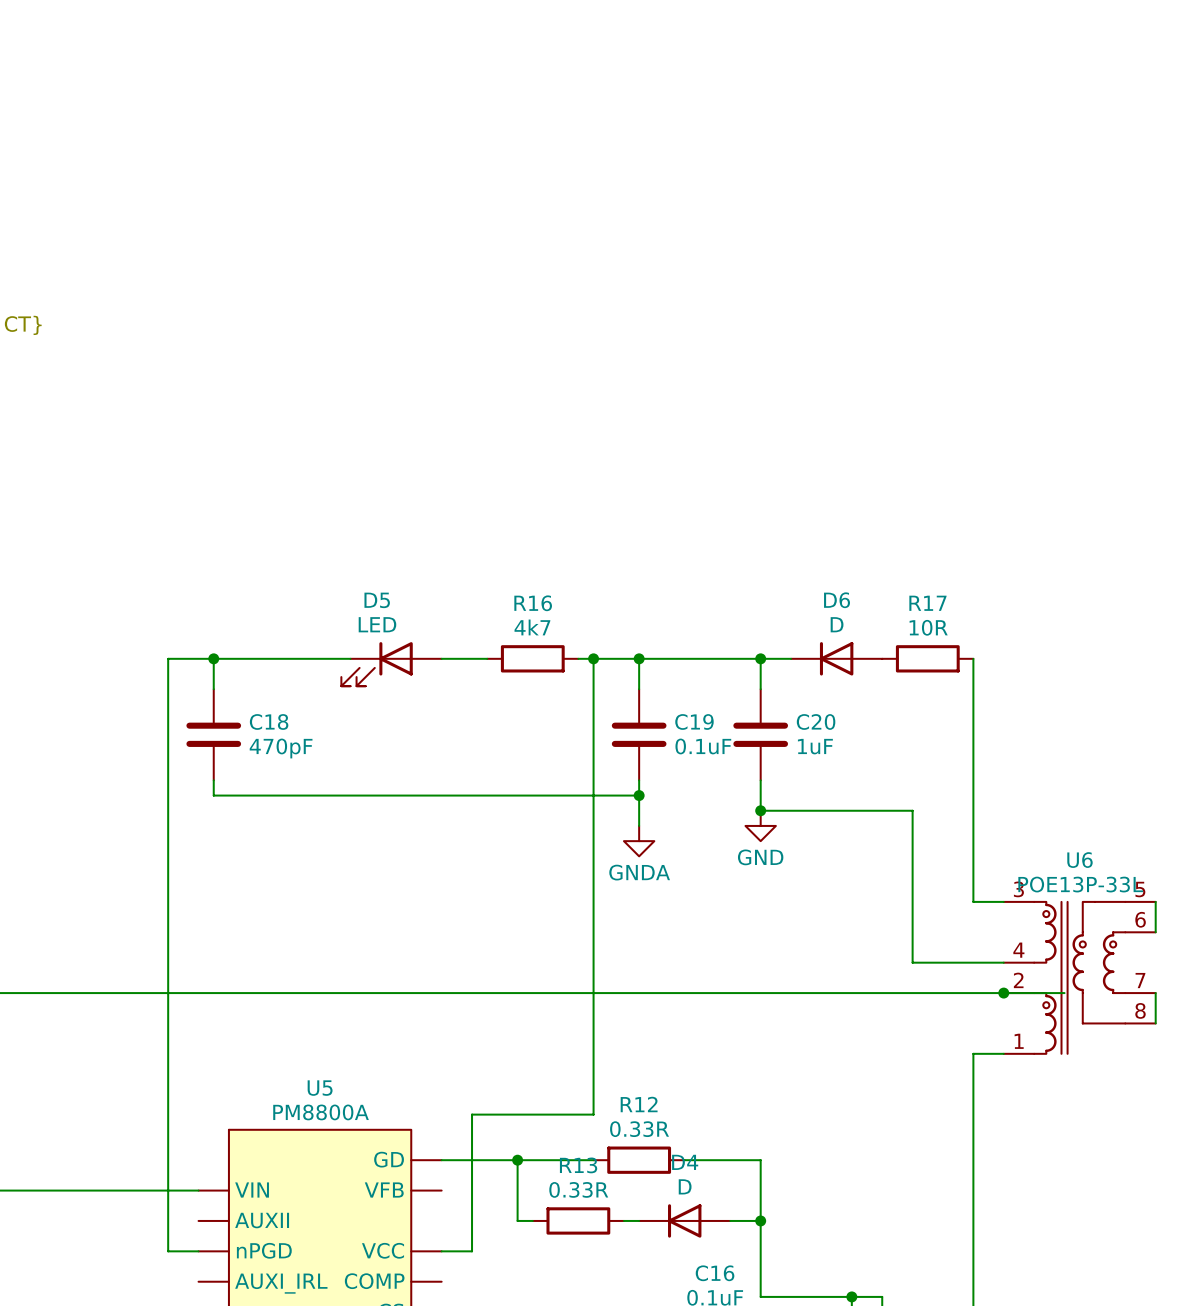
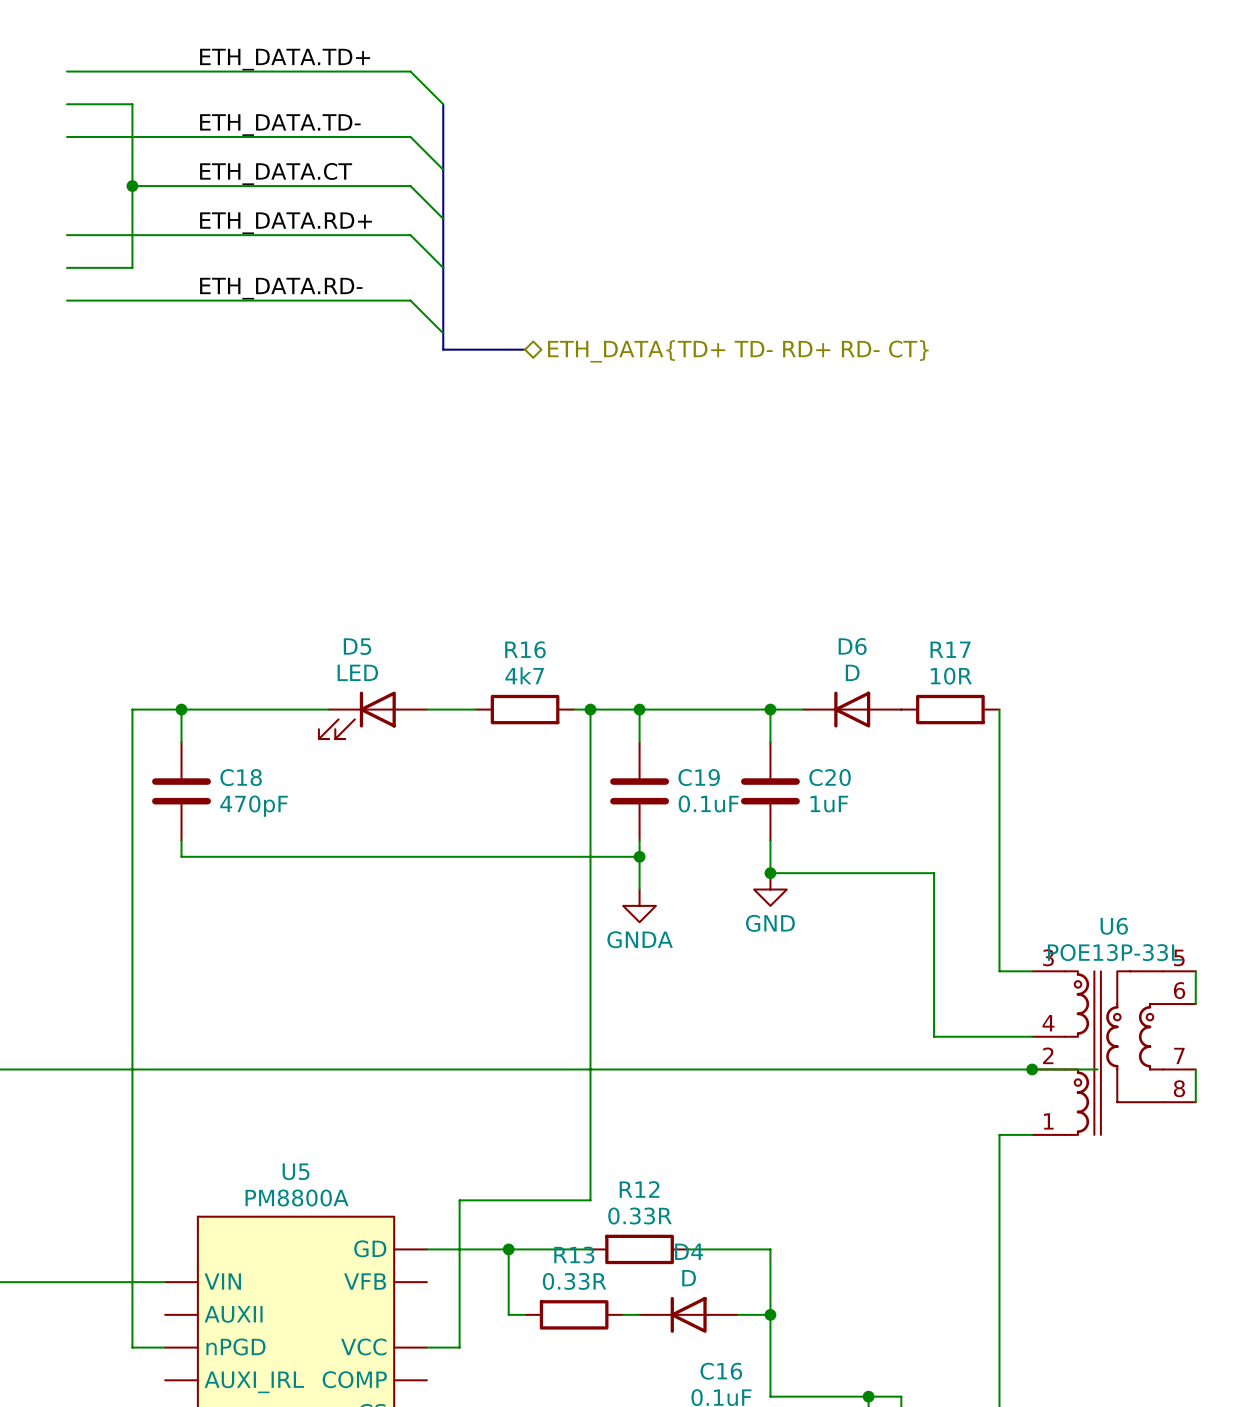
label: none -> ETH_DATA.TD+ (285, 59)
wire: none -> (66, 71) (410, 71) (443, 104)
wire: none -> (66, 104) (132, 104) (132, 267) (66, 267)
bus: none -> (443, 104) (443, 349) (525, 349)
label: none -> ETH_DATA.TD- (280, 125)
wire: none -> (66, 136) (410, 136) (443, 169)
label: none -> ETH_DATA.CT (276, 173)
wire: none -> (132, 186) (410, 186) (443, 218)
junction: none -> (132, 186)
label: none -> ETH_DATA.RD+ (286, 223)
wire: none -> (66, 235) (410, 235) (443, 267)
label: none -> ETH_DATA.RD- (281, 288)
wire: none -> (66, 300) (410, 300) (443, 333)
hierarchical label: none -> ETH_DATA{TD+ TD- RD+ RD- CT} (738, 351)

